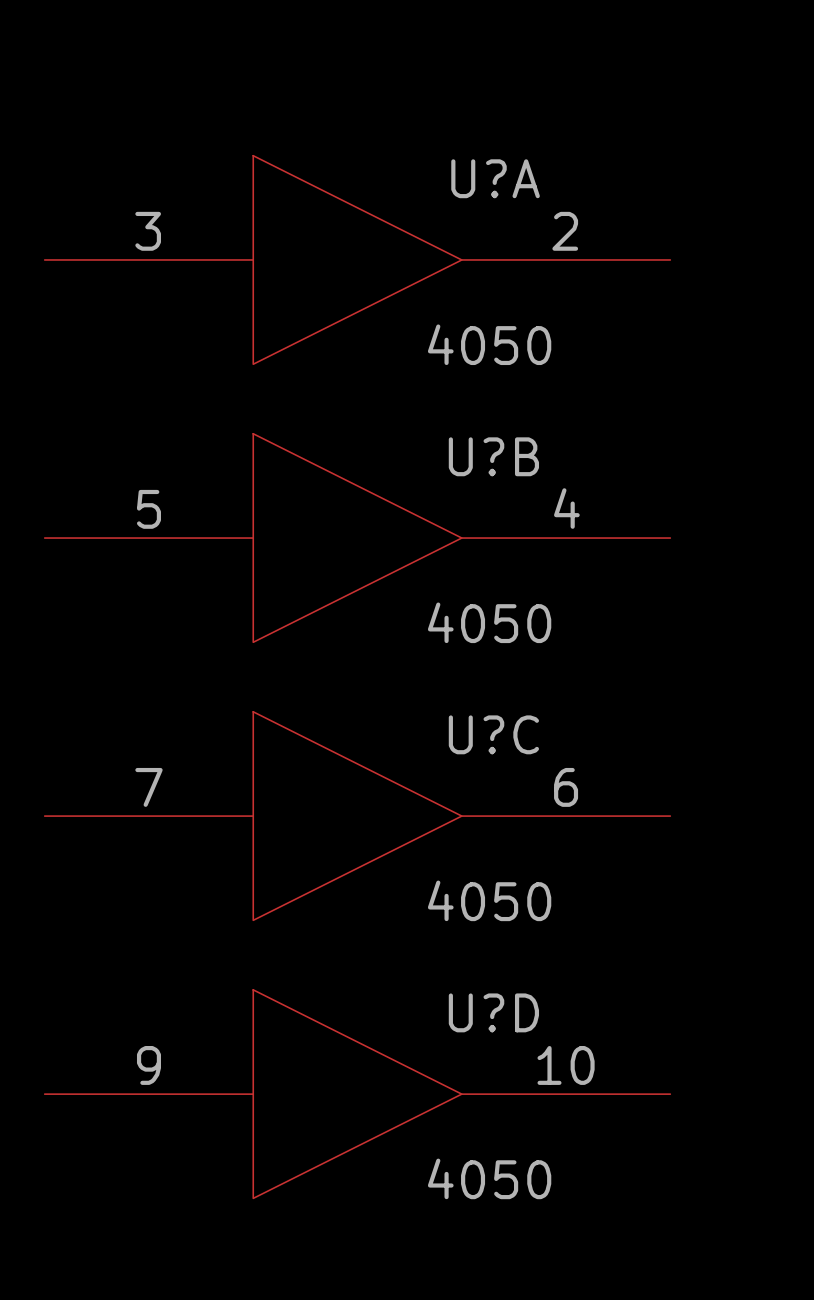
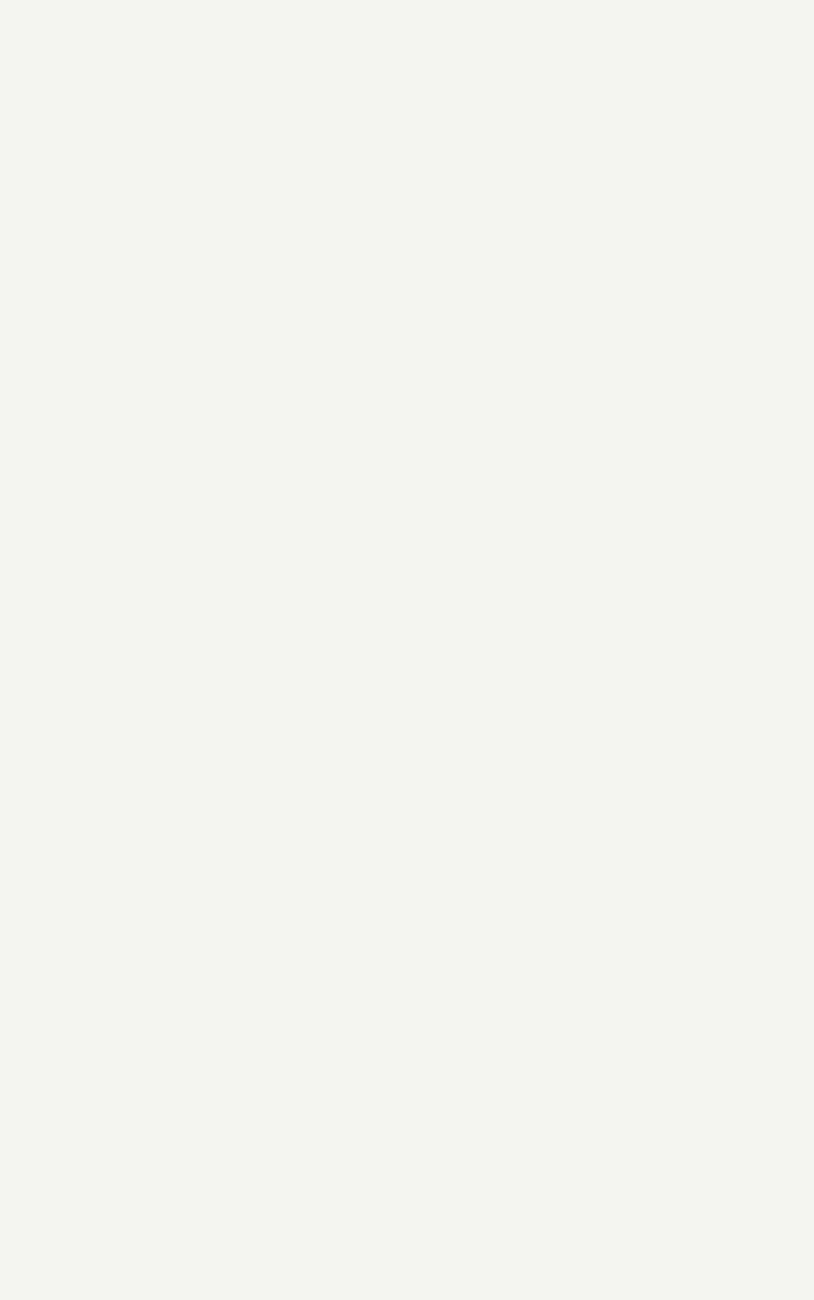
U?A: 4050 (357, 259) -> none
U?B: 4050 (357, 538) -> none
U?C: 4050 (357, 816) -> none
U?D: 4050 (357, 1094) -> none

